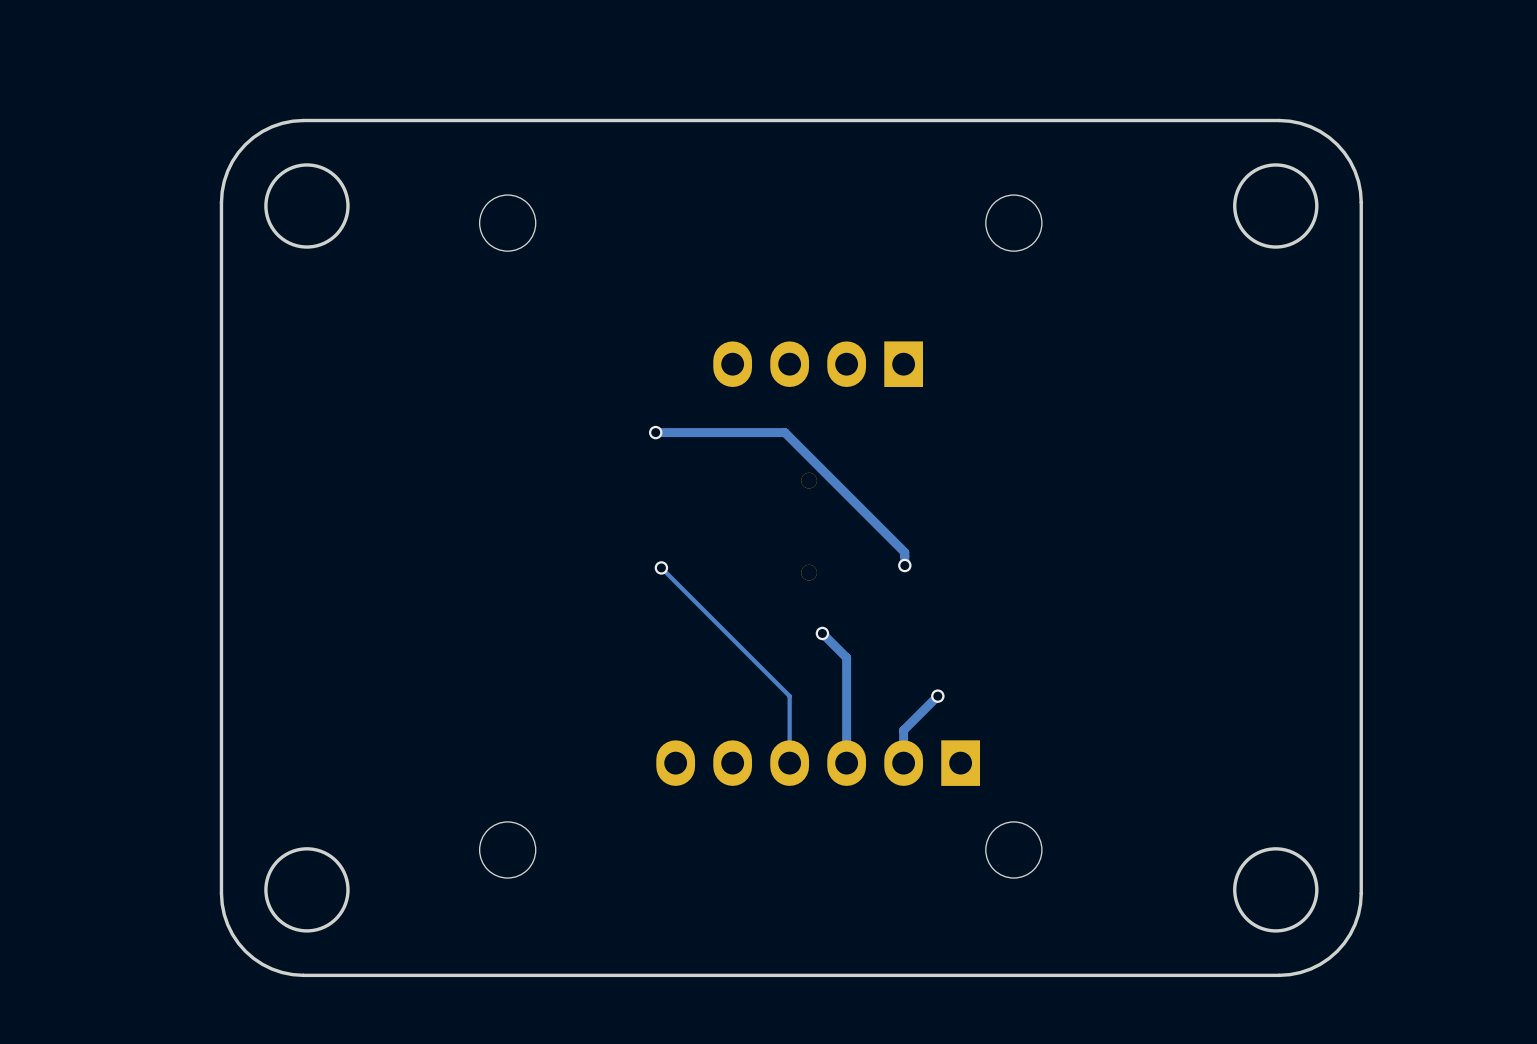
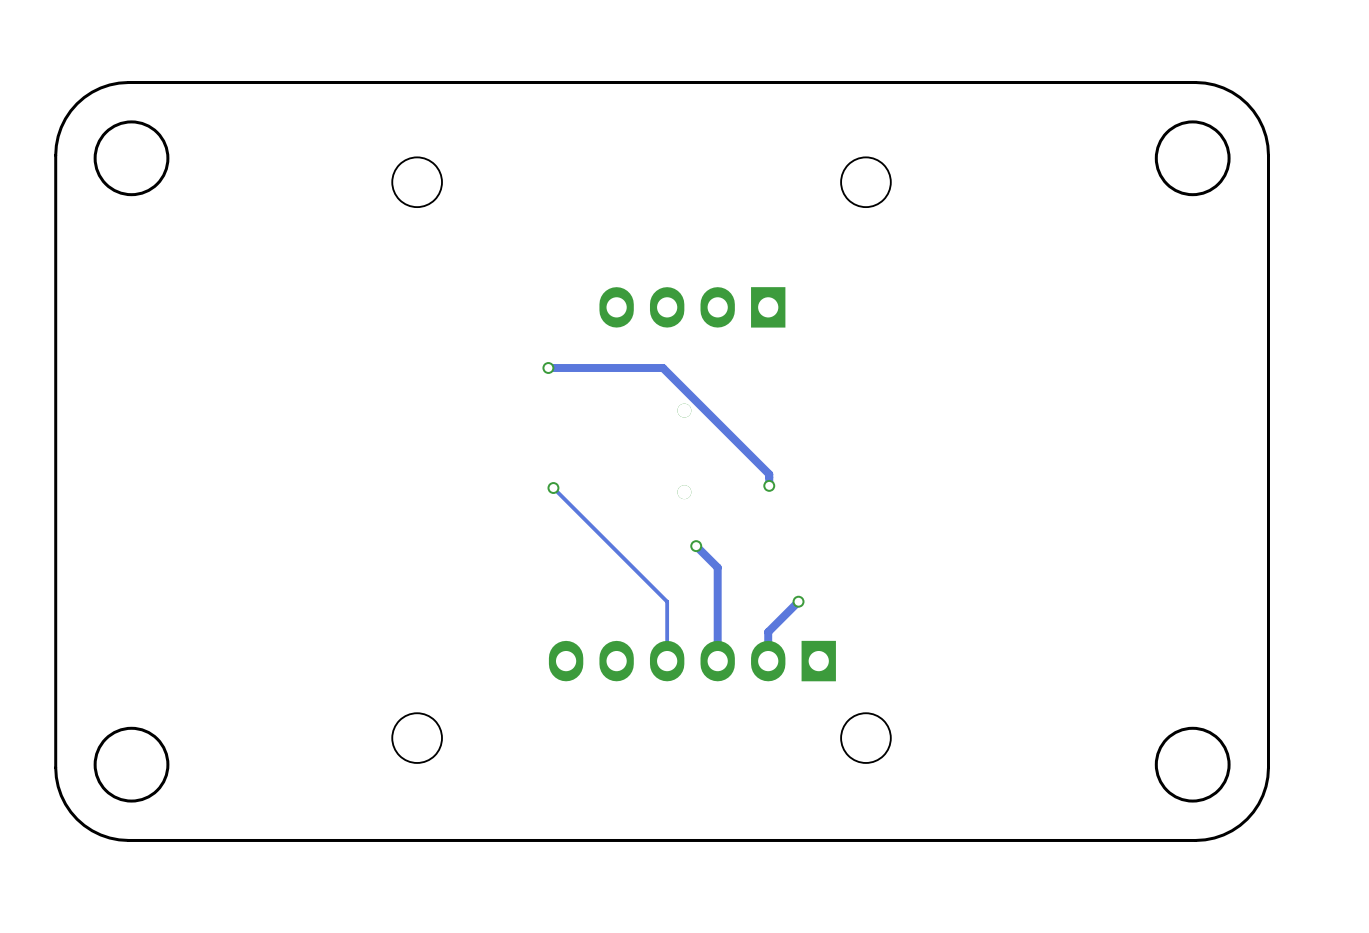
board edge: (1279, 120) (303, 120) (282, 123) (253, 137) (238, 152) (227, 171) (221, 202) (221, 893) (224, 914) (238, 943) (262, 964) (282, 972) (303, 975) (1279, 975) (1310, 969) (1329, 958) (1344, 943) (1355, 924) (1361, 893) (1361, 202) (1355, 171) (1337, 144) (1310, 126) (1279, 120) -> (1195, 82) (1223, 88) (1247, 103) (1262, 127) (1268, 155) (1268, 767) (1266, 786) (1258, 804) (1247, 819) (1232, 830) (1214, 837) (1195, 840) (128, 840) (109, 838) (92, 830) (77, 819) (65, 804) (58, 786) (55, 767) (55, 155) (58, 136) (65, 118) (77, 103) (92, 92) (109, 84) (128, 82) (1195, 82)
round board edge position: (306, 205) -> (131, 158)
round board edge position: (1275, 205) -> (1192, 158)
round board edge position: (306, 889) -> (131, 764)
round board edge position: (1275, 889) -> (1192, 764)

